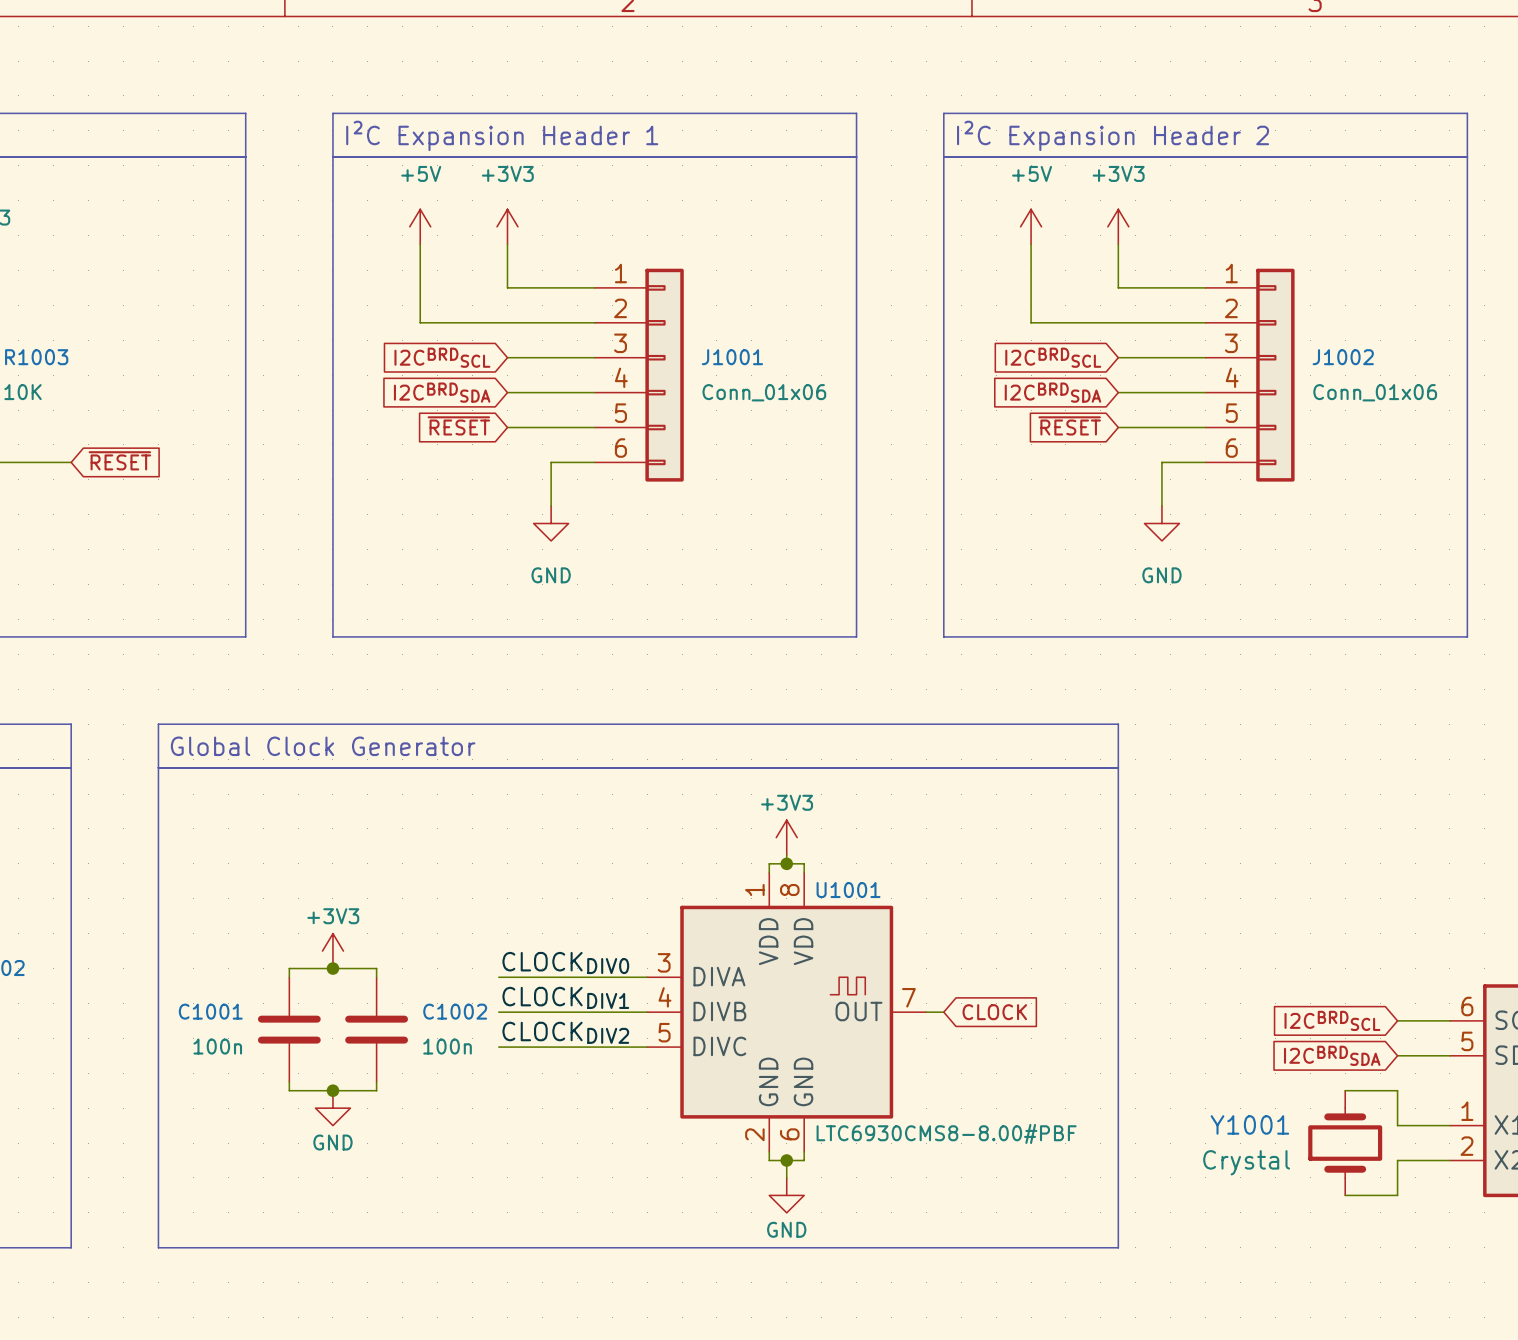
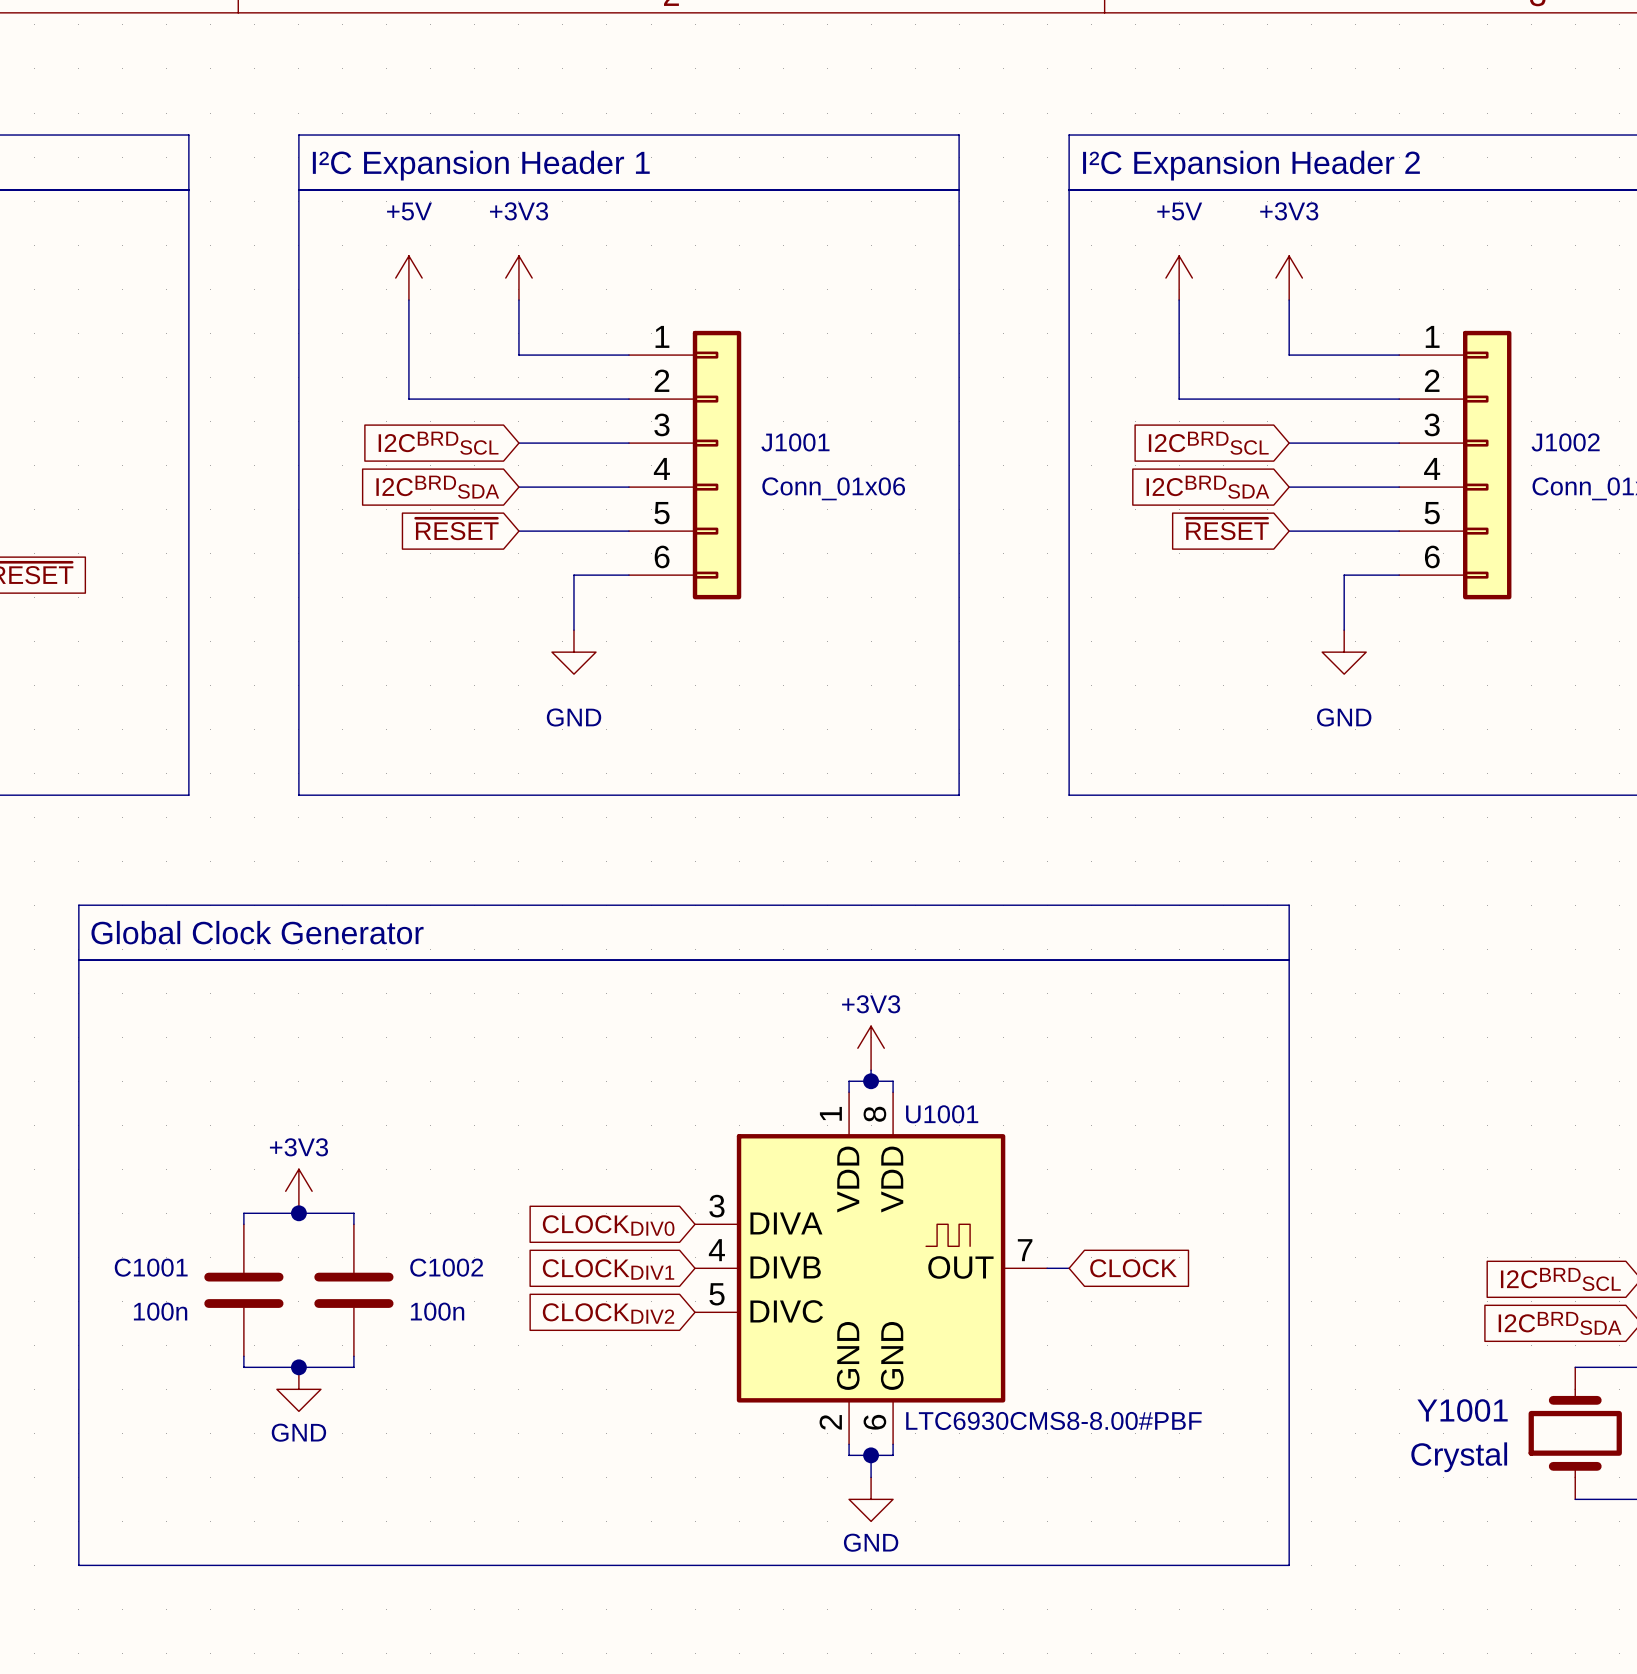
label: CLOCKDIV0 (565, 963) -> none
wire: (498, 977) (647, 977) -> none
global label: none -> CLOCKDIV0 (608, 1225)
label: CLOCKDIV1 (565, 997) -> none
wire: (498, 1012) (647, 1012) -> none
global label: none -> CLOCKDIV1 (608, 1269)
label: CLOCKDIV2 (565, 1032) -> none
wire: (498, 1047) (647, 1047) -> none
global label: none -> CLOCKDIV2 (608, 1313)

